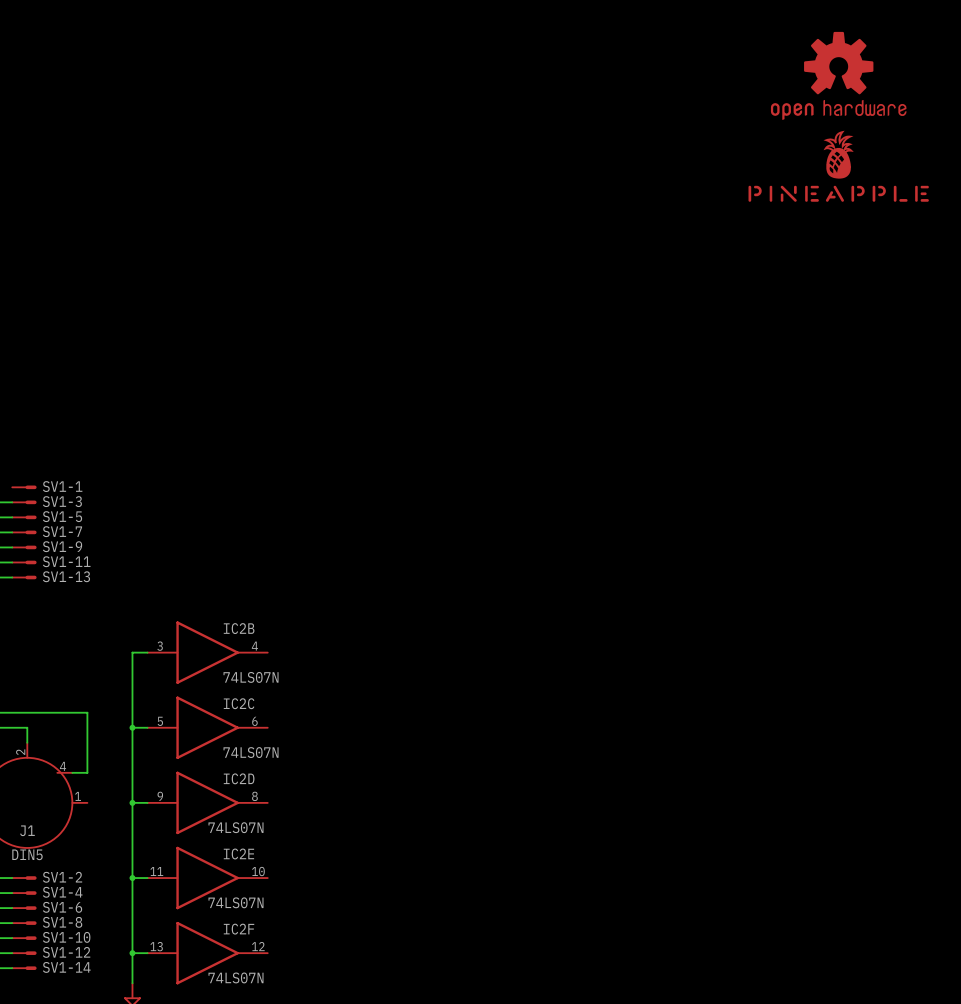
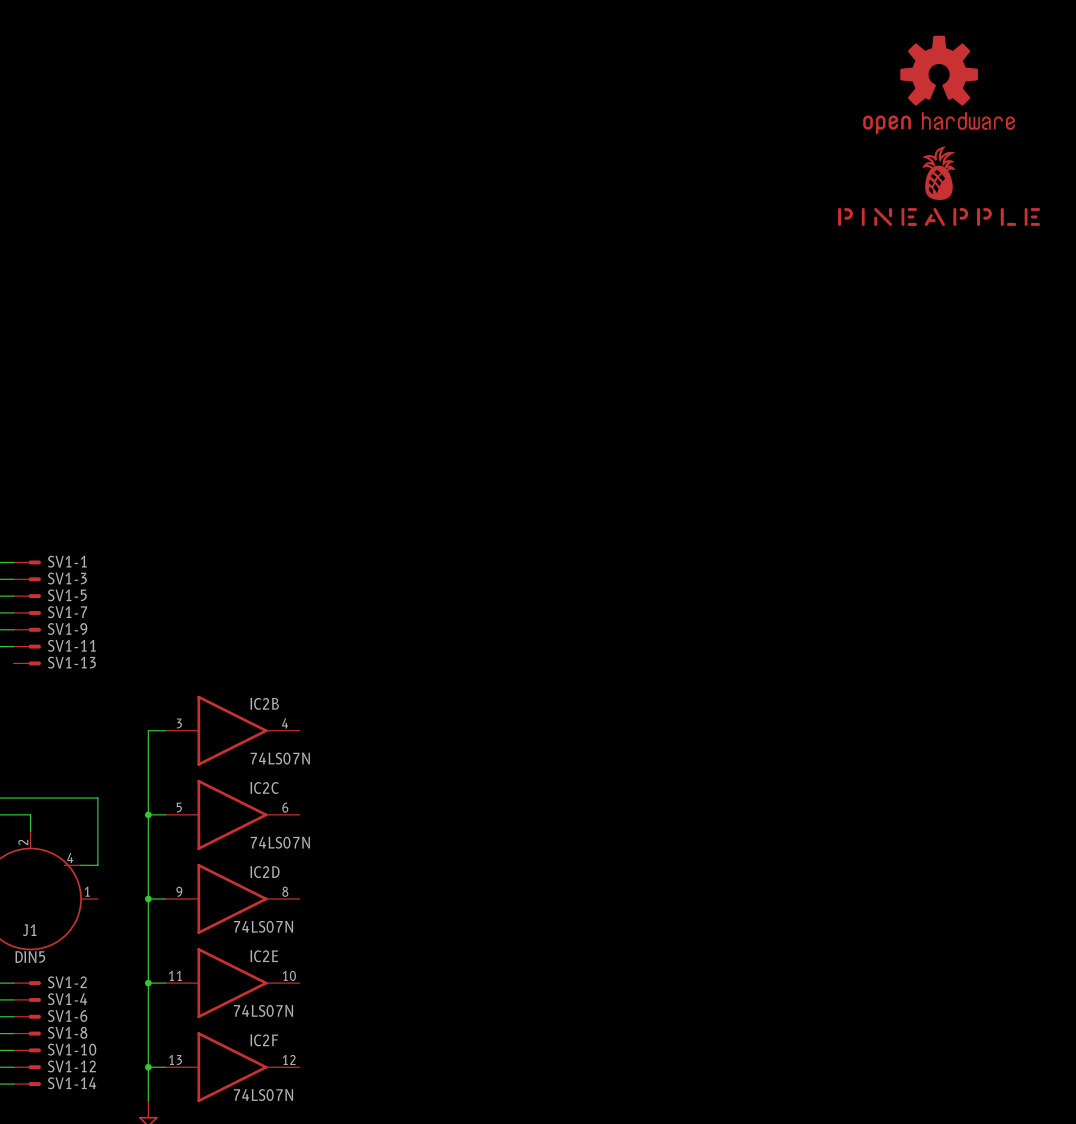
SV1-1: (24, 487) -> none
SV1-3 name: SV1-3 (62, 501) -> SV1-1 (67, 561)
SV1-5 name: SV1-5 (62, 516) -> SV1-3 (67, 578)
SV1-7 name: SV1-7 (62, 531) -> SV1-5 (67, 595)
SV1-9 name: SV1-9 (62, 546) -> SV1-7 (67, 612)
SV1-11 name: SV1-11 (66, 561) -> SV1-9 (67, 629)
SV1-13 name: SV1-13 (66, 576) -> SV1-11 (71, 645)
SV1-13: none -> (27, 663)

